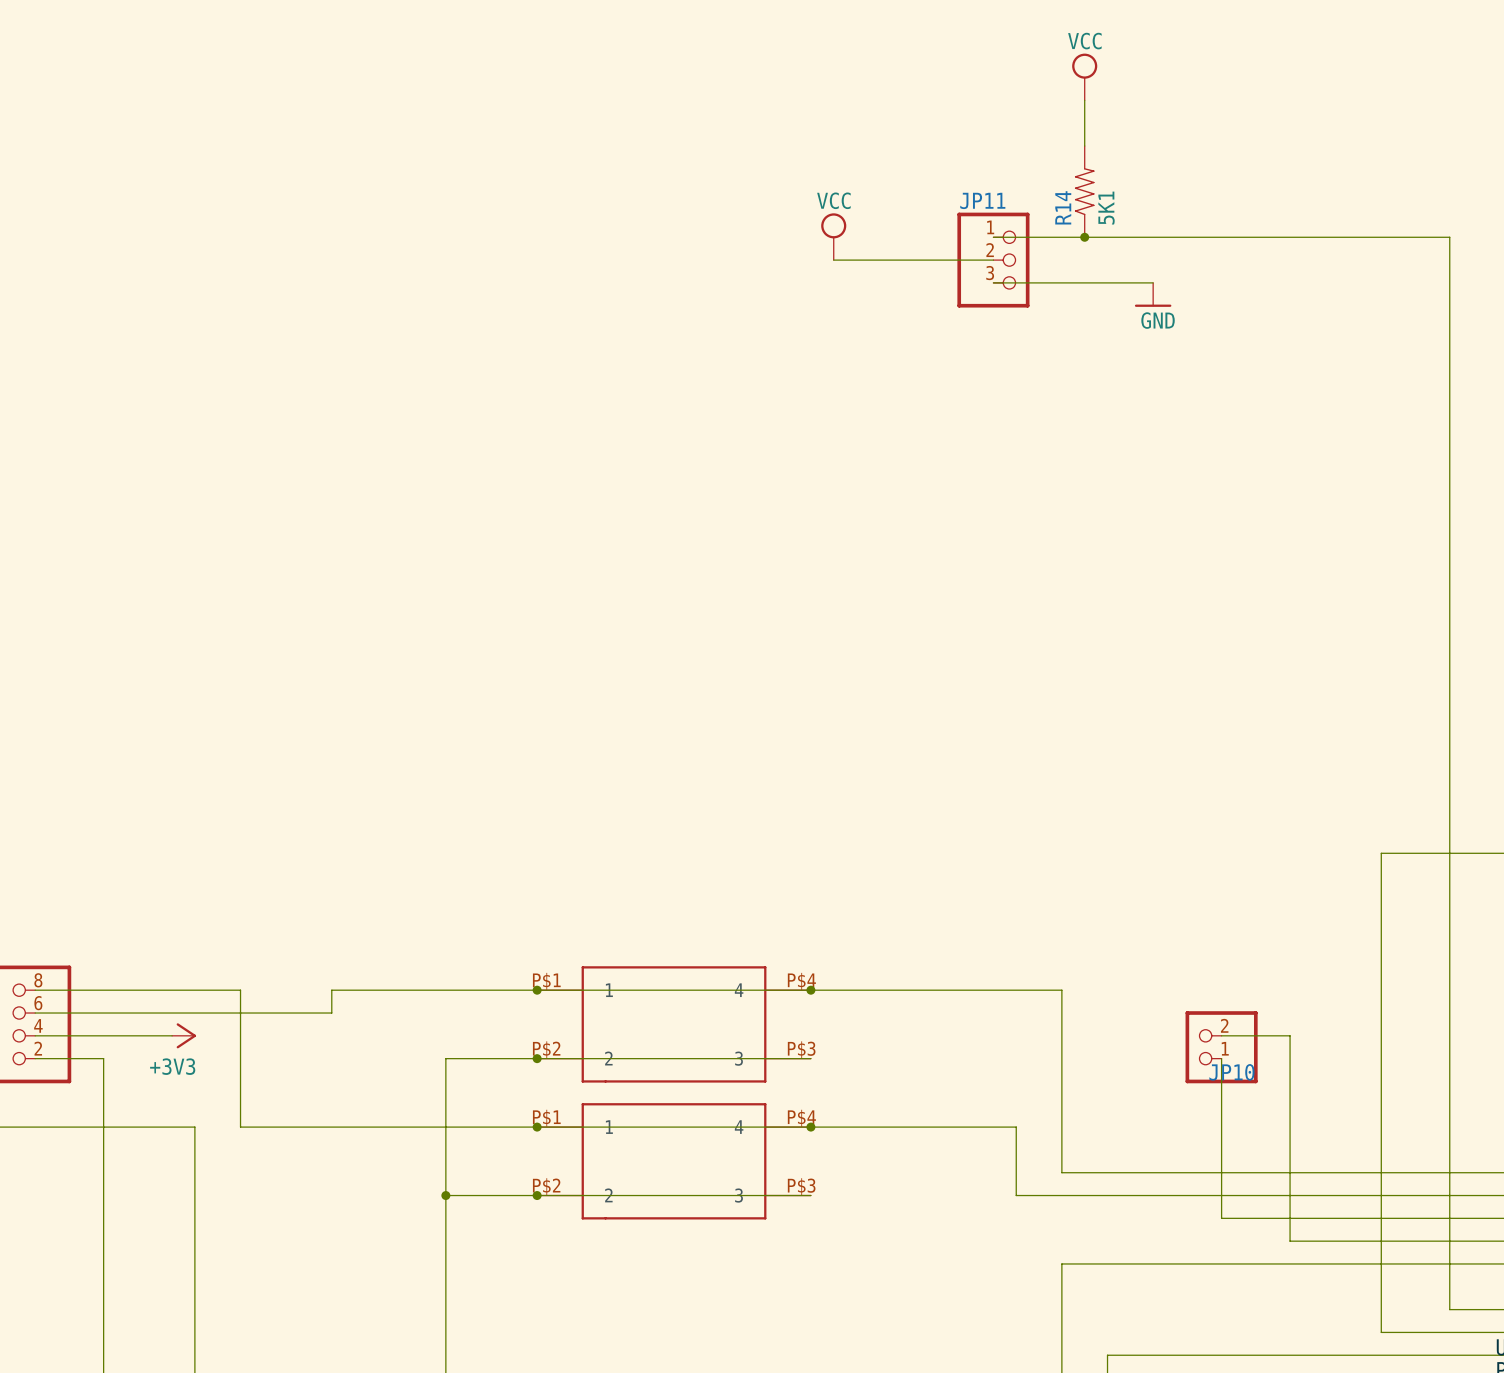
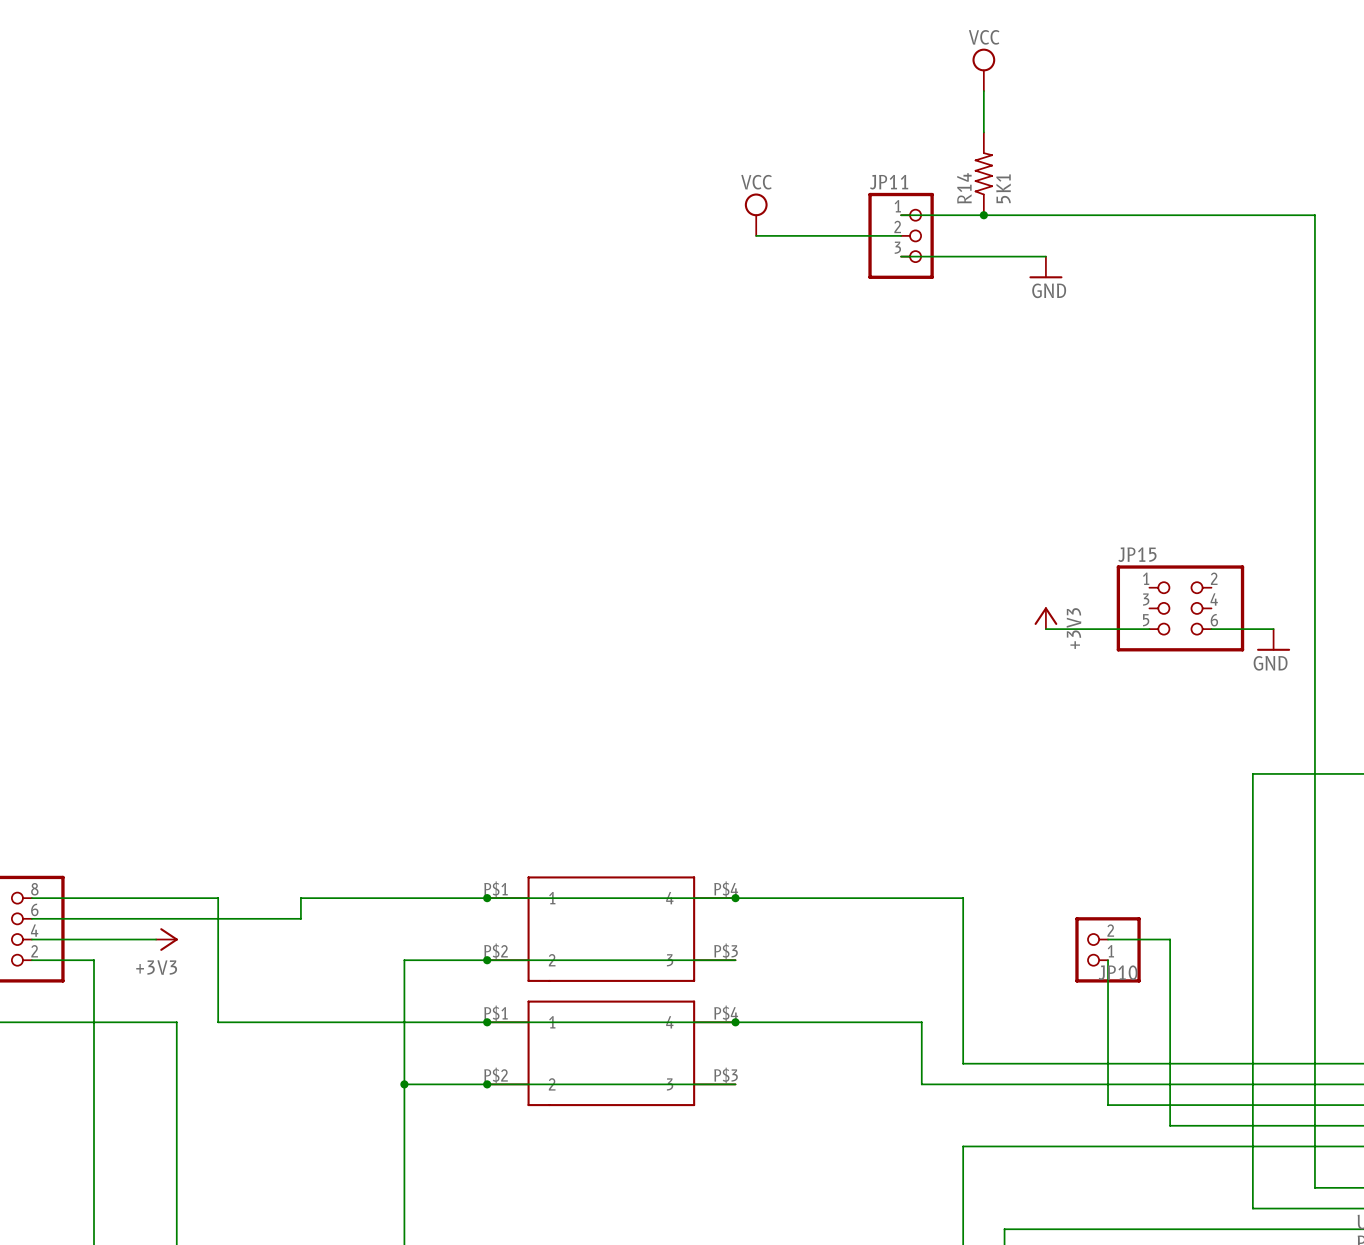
JP15: none -> (1180, 608)
power symbol: none -> +3V3 (1045, 618)
wire: none -> (1045, 629) (1149, 629)
wire: none -> (1211, 629) (1273, 629)
power symbol: none -> GND (1273, 639)

